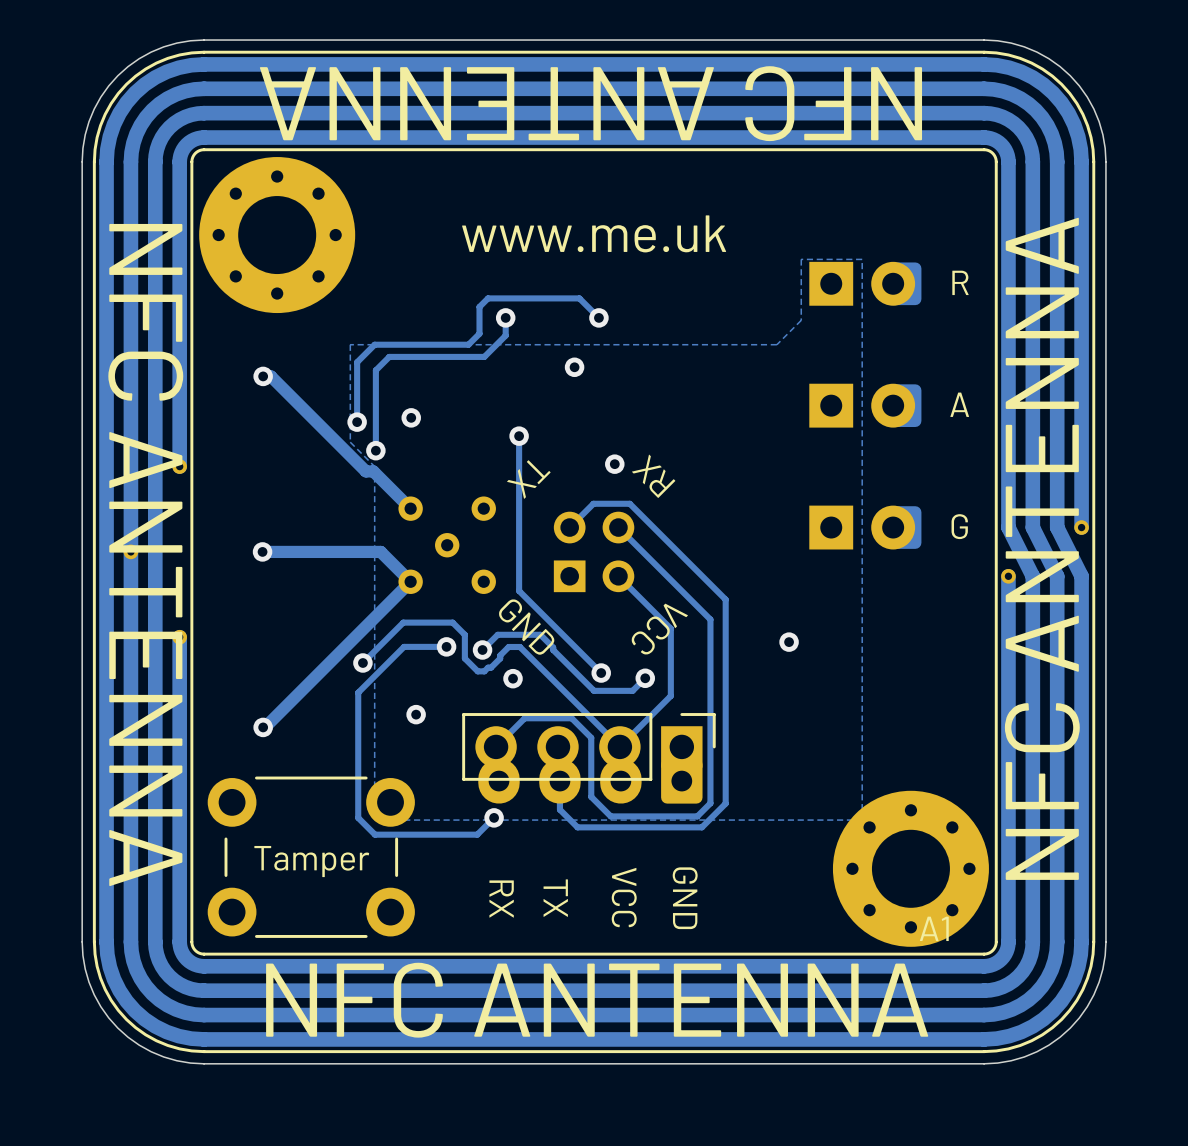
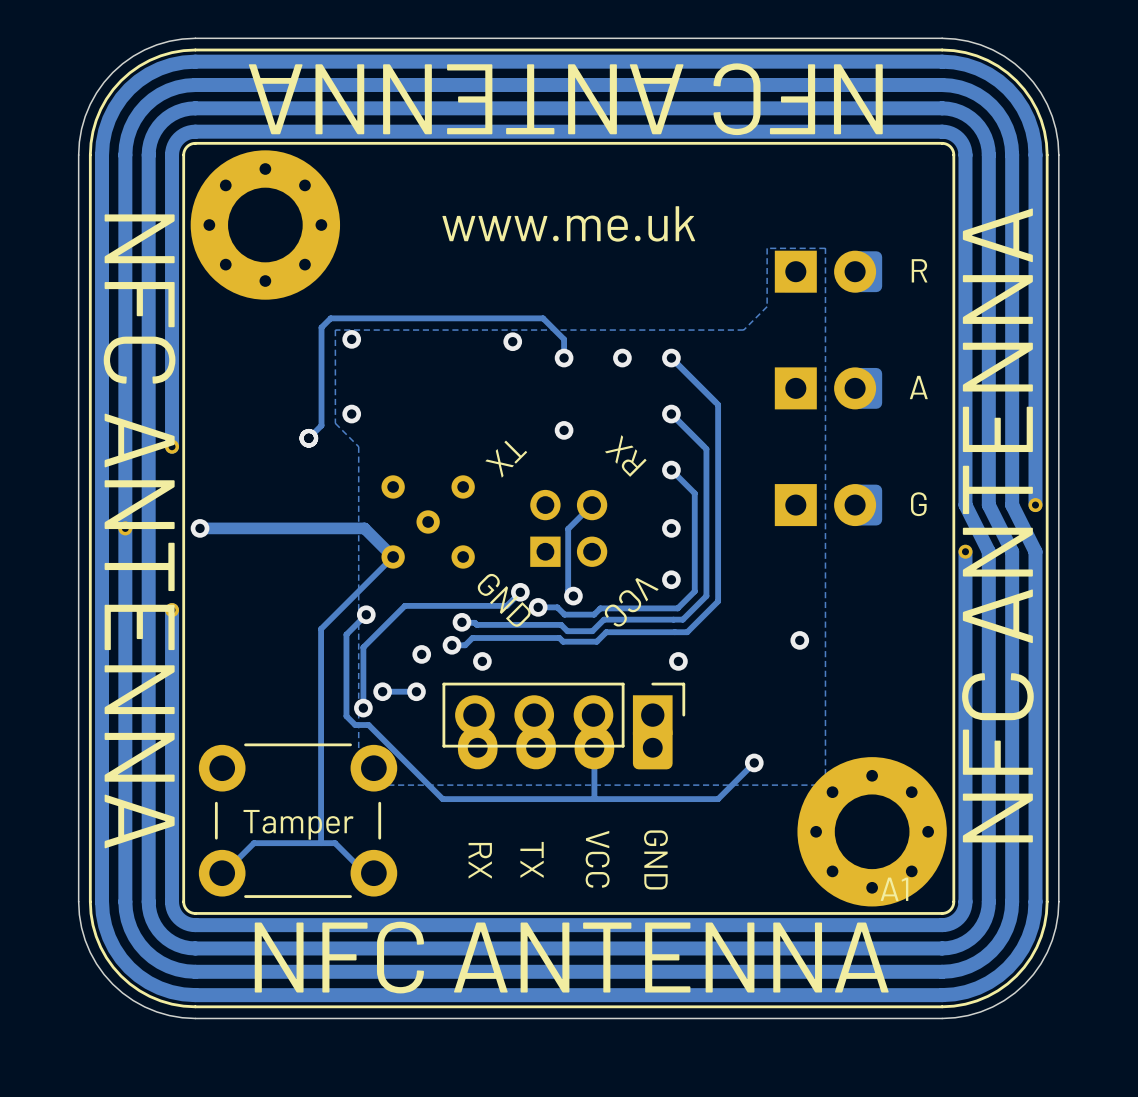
track: (505, 317) (505, 335) (484, 356) (389, 356) (375, 370) (375, 450) -> none
via: (505, 317) -> none
track: (598, 317) (579, 298) (488, 298) (479, 306) (479, 333) (468, 344) (374, 344) (357, 362) (357, 422) -> none
via: (598, 317) -> none
via: none -> (351, 339)
via: none -> (512, 341)
via position: (574, 367) -> (564, 358)
track: none -> (564, 358) (564, 339) (543, 318) (330, 318) (321, 327) (321, 425) (308, 438)
via: none -> (622, 358)
track: none -> (671, 358) (718, 404) (718, 601) (687, 632) (606, 632) (596, 641) (563, 641) (559, 637) (472, 637) (465, 645) (451, 645)
via: none -> (671, 358)
track: (263, 376) (270, 376) (365, 471) (373, 471) (410, 508) -> none
via: (263, 376) -> none
via: (411, 417) -> none
via: (357, 422) -> none
via: none -> (351, 414)
via: none -> (671, 414)
track: (519, 436) (519, 590) (601, 673) -> none
via: (519, 436) -> none
via: (375, 450) -> none
via: none -> (308, 438)
via position: (614, 464) -> (564, 430)
via: none -> (671, 470)
track: (569, 527) (593, 503) (629, 503) (725, 599) -> (671, 470) (694, 493) (694, 574)
track: (618, 527) (710, 619) (710, 803) (697, 816) (610, 816) (591, 796) (591, 737) (571, 718) (524, 718) (496, 746) -> (592, 505) (568, 528) (568, 590) (573, 596)
track: none -> (251, 528) (200, 528)
via position: (262, 551) -> (200, 528)
via: none -> (671, 528)
track: (618, 576) (670, 628) (670, 695) (619, 746) (519, 646) (508, 646) (491, 667) (484, 671) (477, 671) (464, 658) (464, 634) (452, 622) (403, 622) (362, 662) -> none
track width: thick (410, 581) (335, 657) -> thin (393, 556) (321, 629)
via: none -> (671, 579)
track: (725, 617) (725, 803) (701, 827) (577, 827) (559, 809) (559, 781) -> (694, 591) (677, 608) (600, 608) (594, 614) (564, 614) (557, 607) (538, 607)
track: none -> (520, 592) (506, 605) (404, 605) (363, 647) (363, 708)
via: none -> (520, 592)
via: none -> (573, 596)
via: none -> (538, 607)
via: (789, 642) -> none
track: (446, 646) (404, 646) (358, 692) (358, 817) (375, 834) (462, 834) -> (366, 614) (346, 634) (346, 716) (355, 725) (368, 725) (442, 799)
via: (446, 646) -> none
track: (482, 650) (497, 634) (540, 634) (594, 690) (632, 690) (645, 678) -> (461, 622) (474, 622) (476, 624) (561, 624) (567, 631) (592, 631) (603, 619) (682, 619) (706, 596) (706, 449) (671, 414)
track: (335, 657) (263, 727) -> (321, 629) (321, 843)
via position: (362, 662) -> (366, 614)
via: none -> (799, 640)
via: (601, 673) -> none
via: none -> (451, 645)
via position: (513, 678) -> (482, 661)
via: (645, 678) -> none
via: none -> (421, 654)
via: none -> (678, 661)
via: (416, 714) -> none
via: none -> (382, 691)
track: none -> (416, 691) (382, 691)
via: none -> (416, 691)
via: (263, 727) -> none
via: none -> (363, 708)
track: none -> (594, 747) (594, 799)
via: none -> (754, 762)
track: (494, 817) (477, 834) -> (754, 762) (718, 799) (456, 799)
via: (494, 817) -> none
track: none -> (370, 878) (335, 843) (253, 843) (218, 878)

